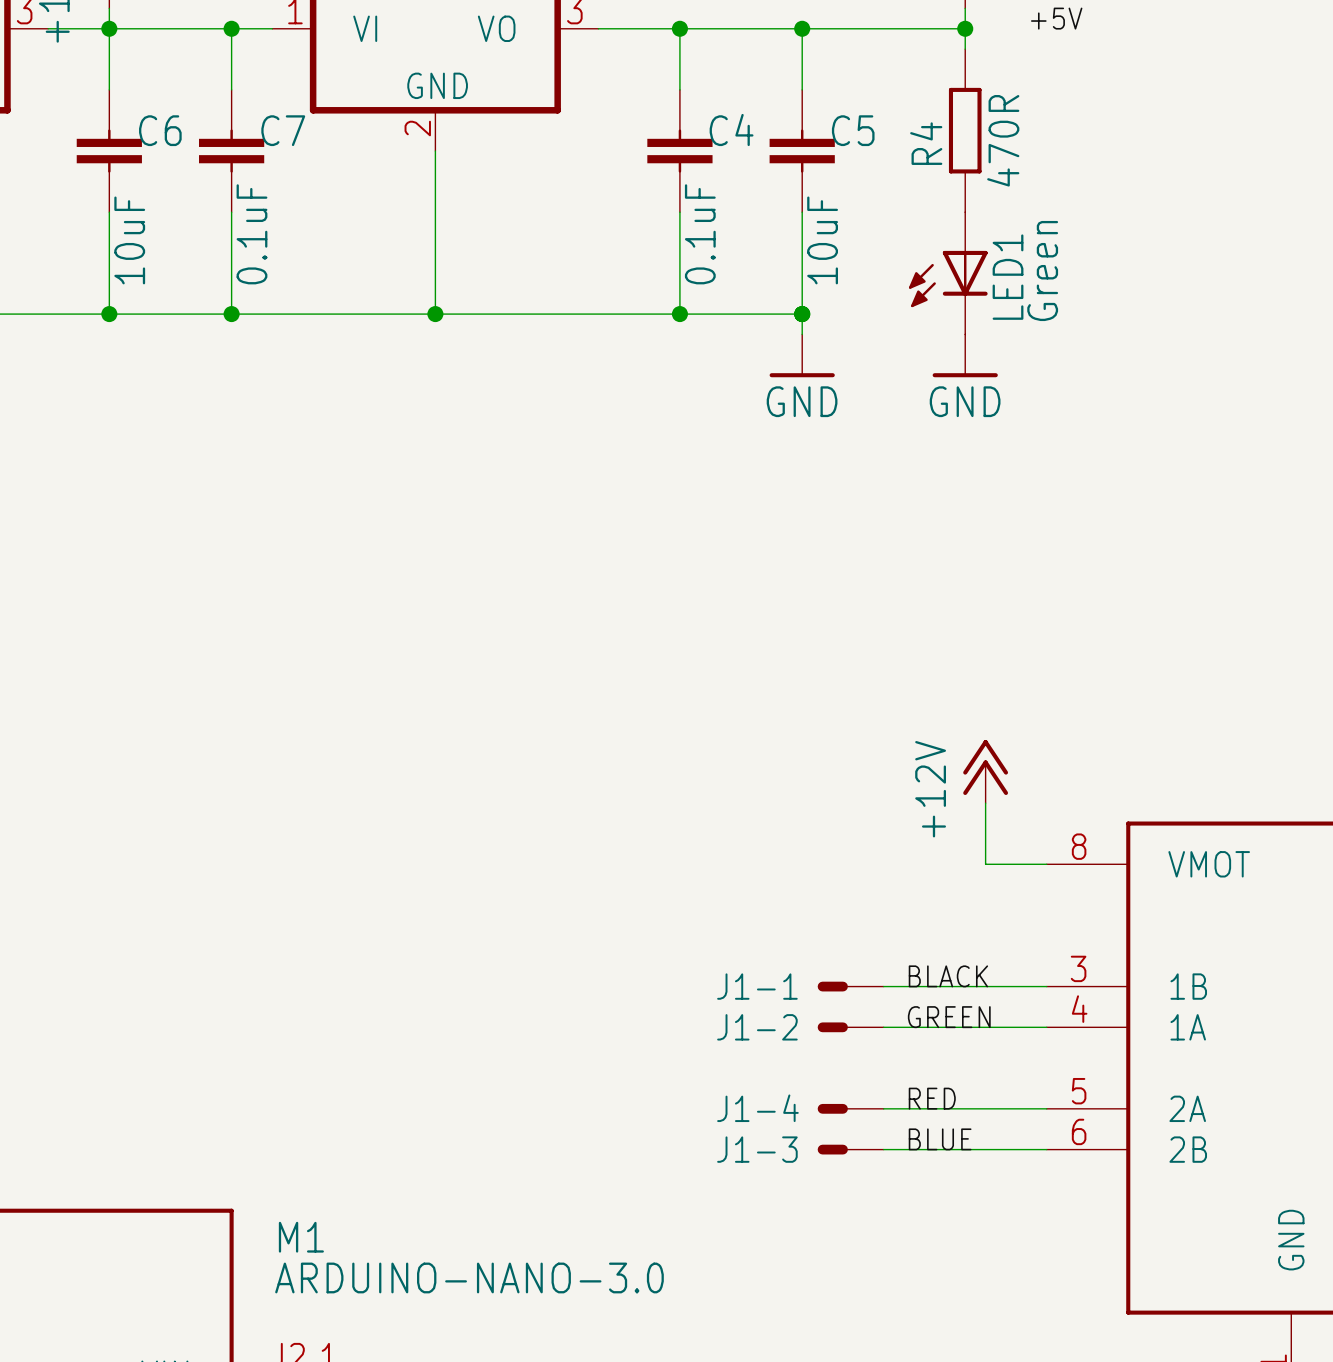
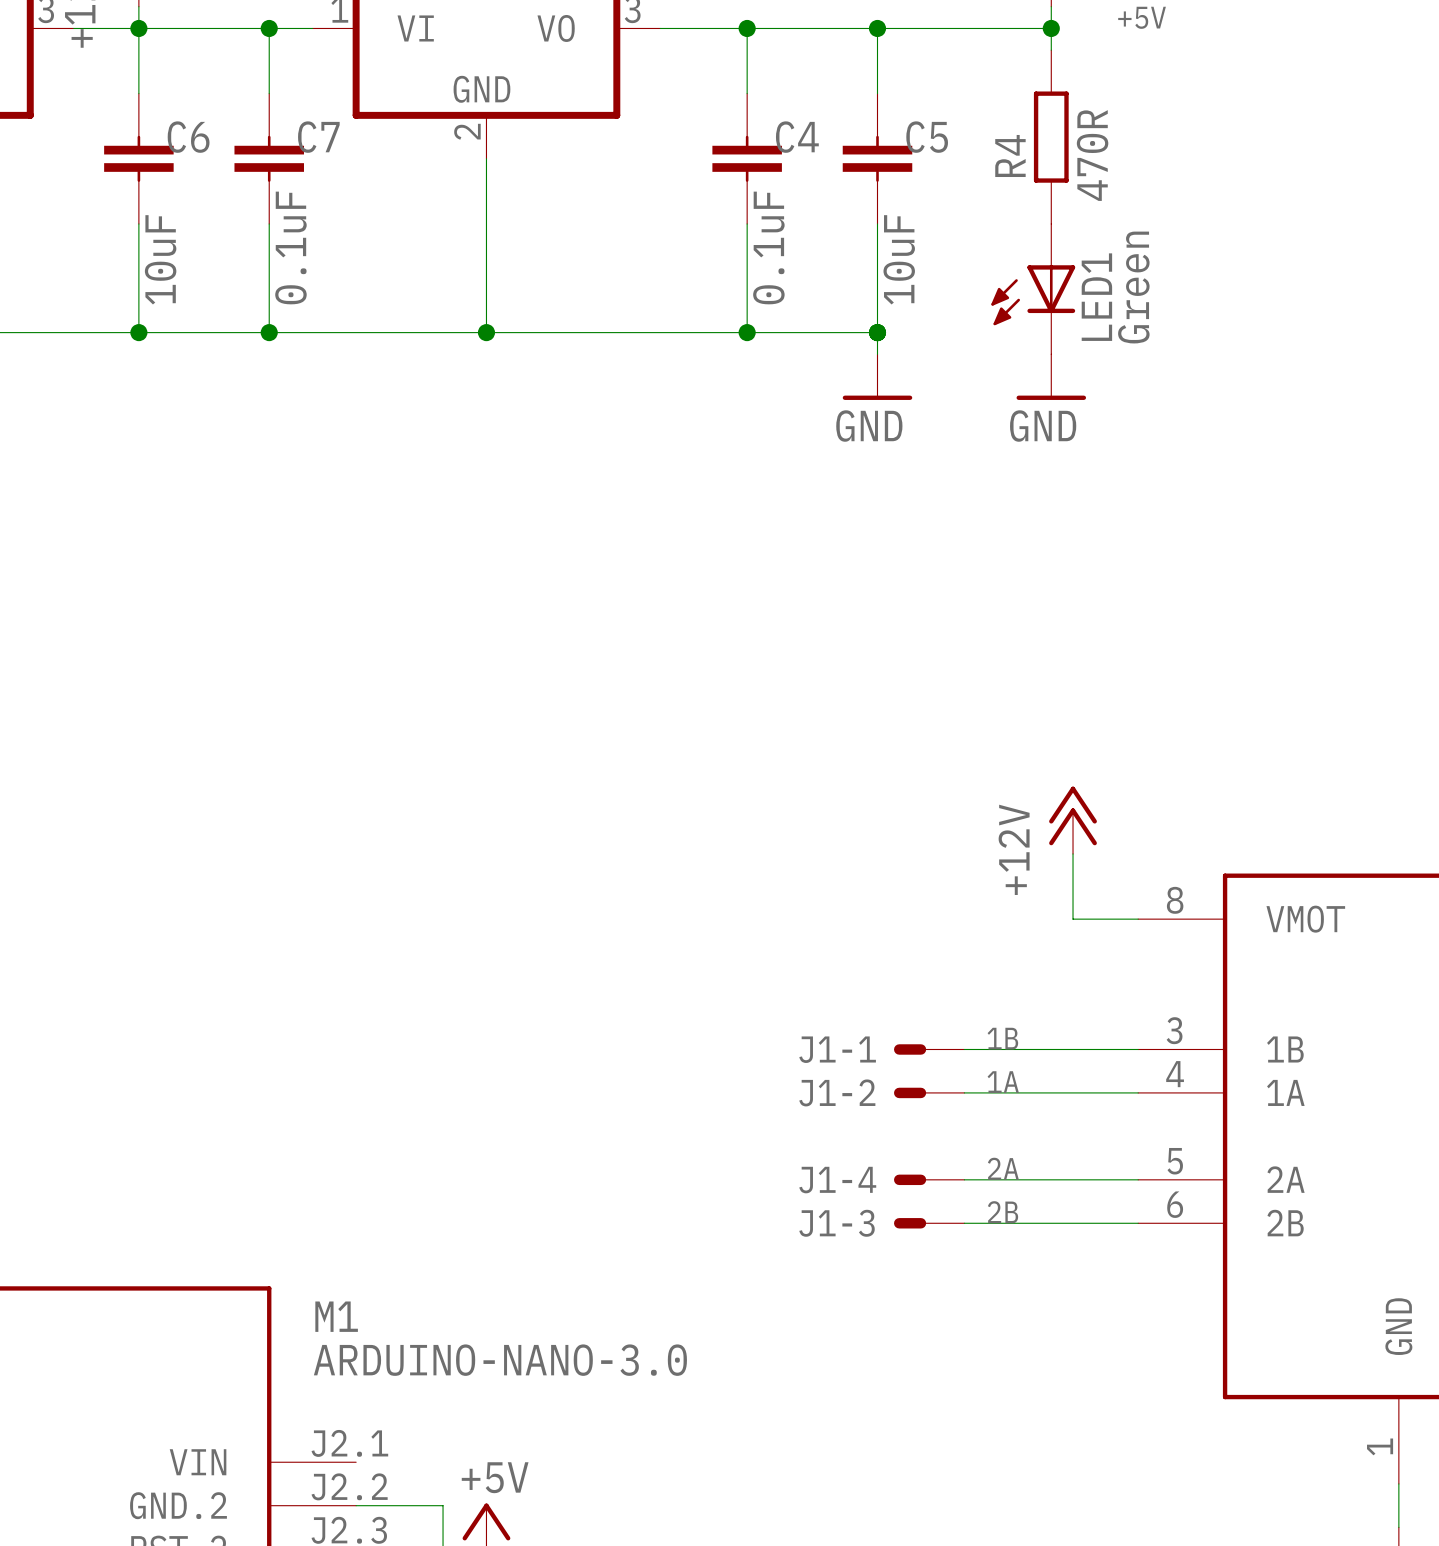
label: BLACK (948, 976) -> 1B (1002, 1038)
label: GREEN (949, 1017) -> 1A (1003, 1082)
label: RED (932, 1098) -> 2A (1003, 1168)
label: BLUE (940, 1139) -> 2B (1003, 1212)

